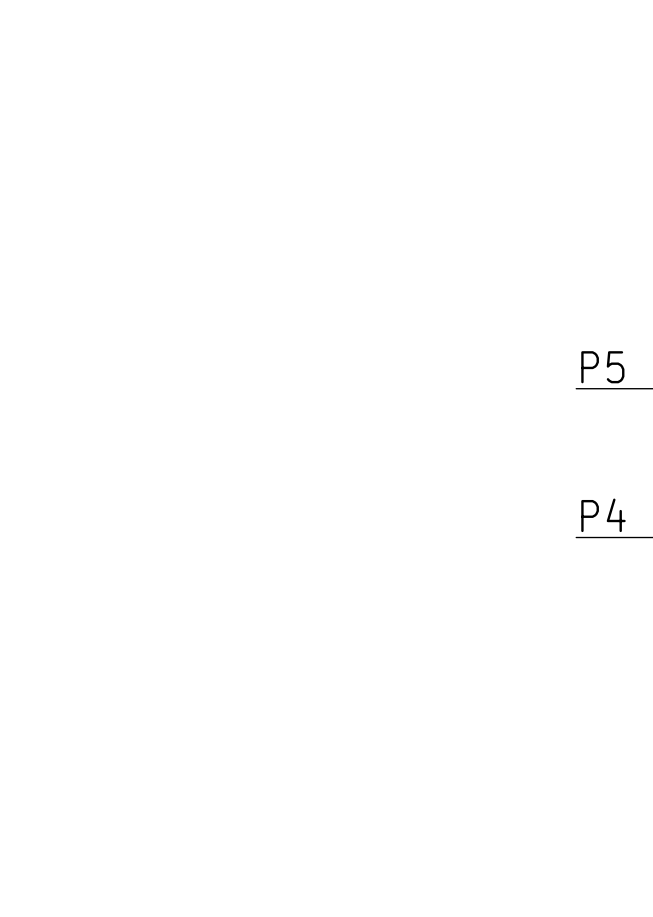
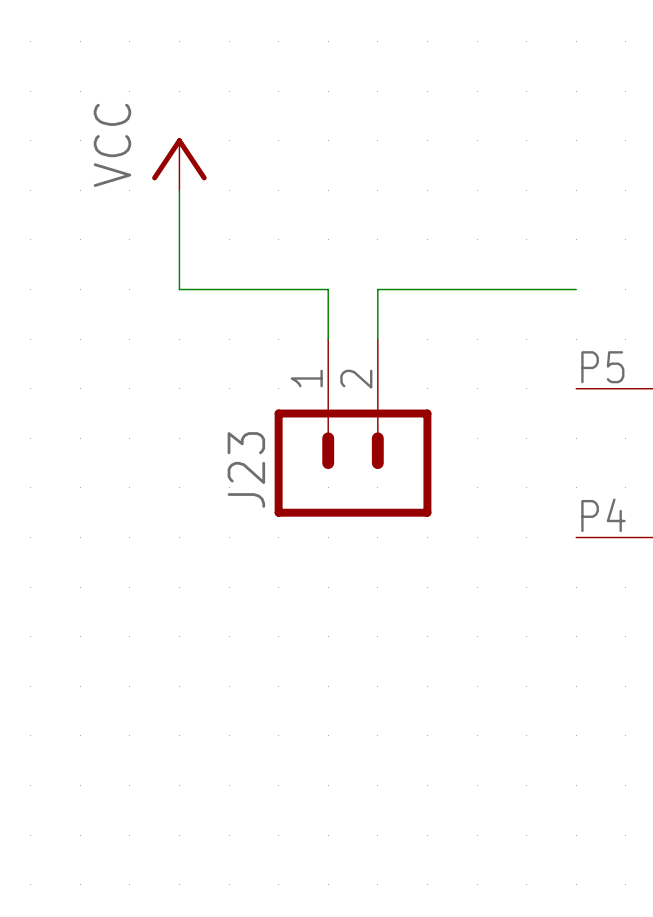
power symbol: none -> VCC (179, 164)
wire: none -> (179, 190) (179, 289) (328, 289) (328, 339)
wire: none -> (576, 289) (377, 289) (377, 339)
J23: none -> (353, 427)

